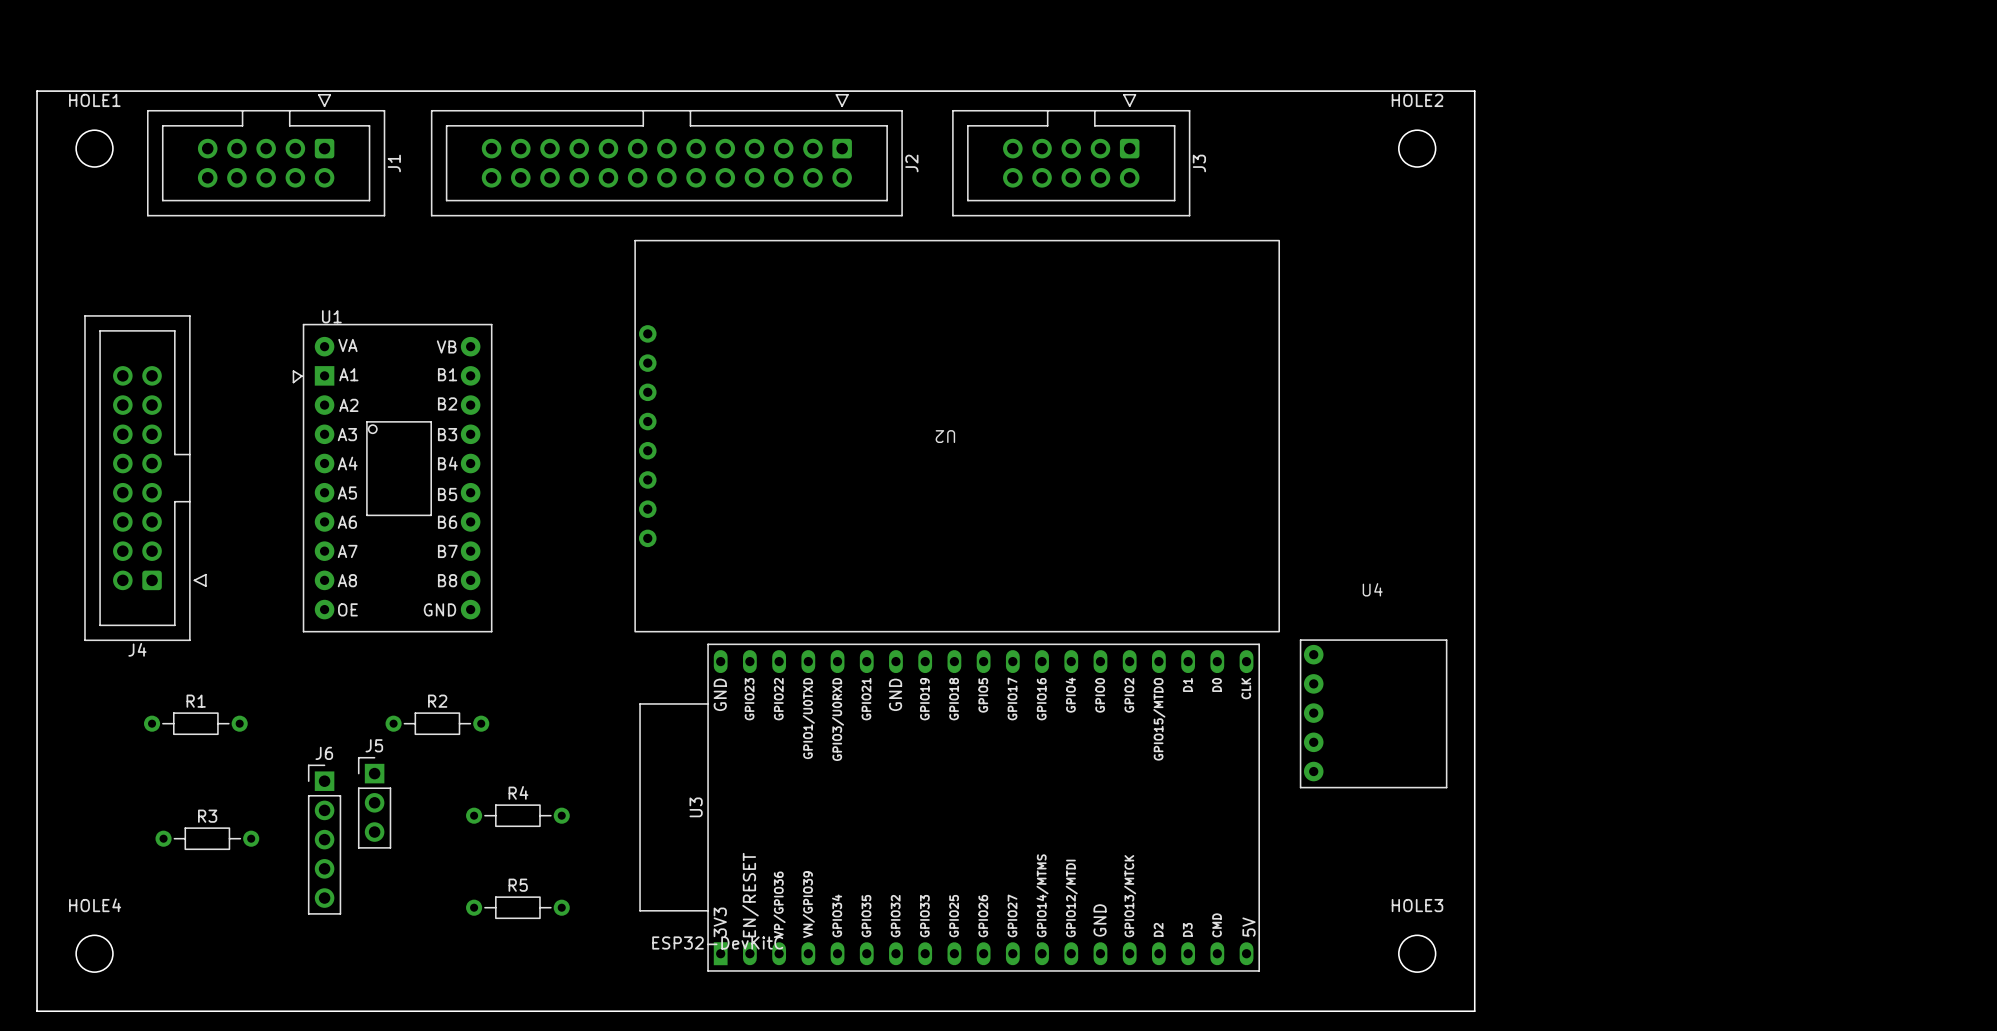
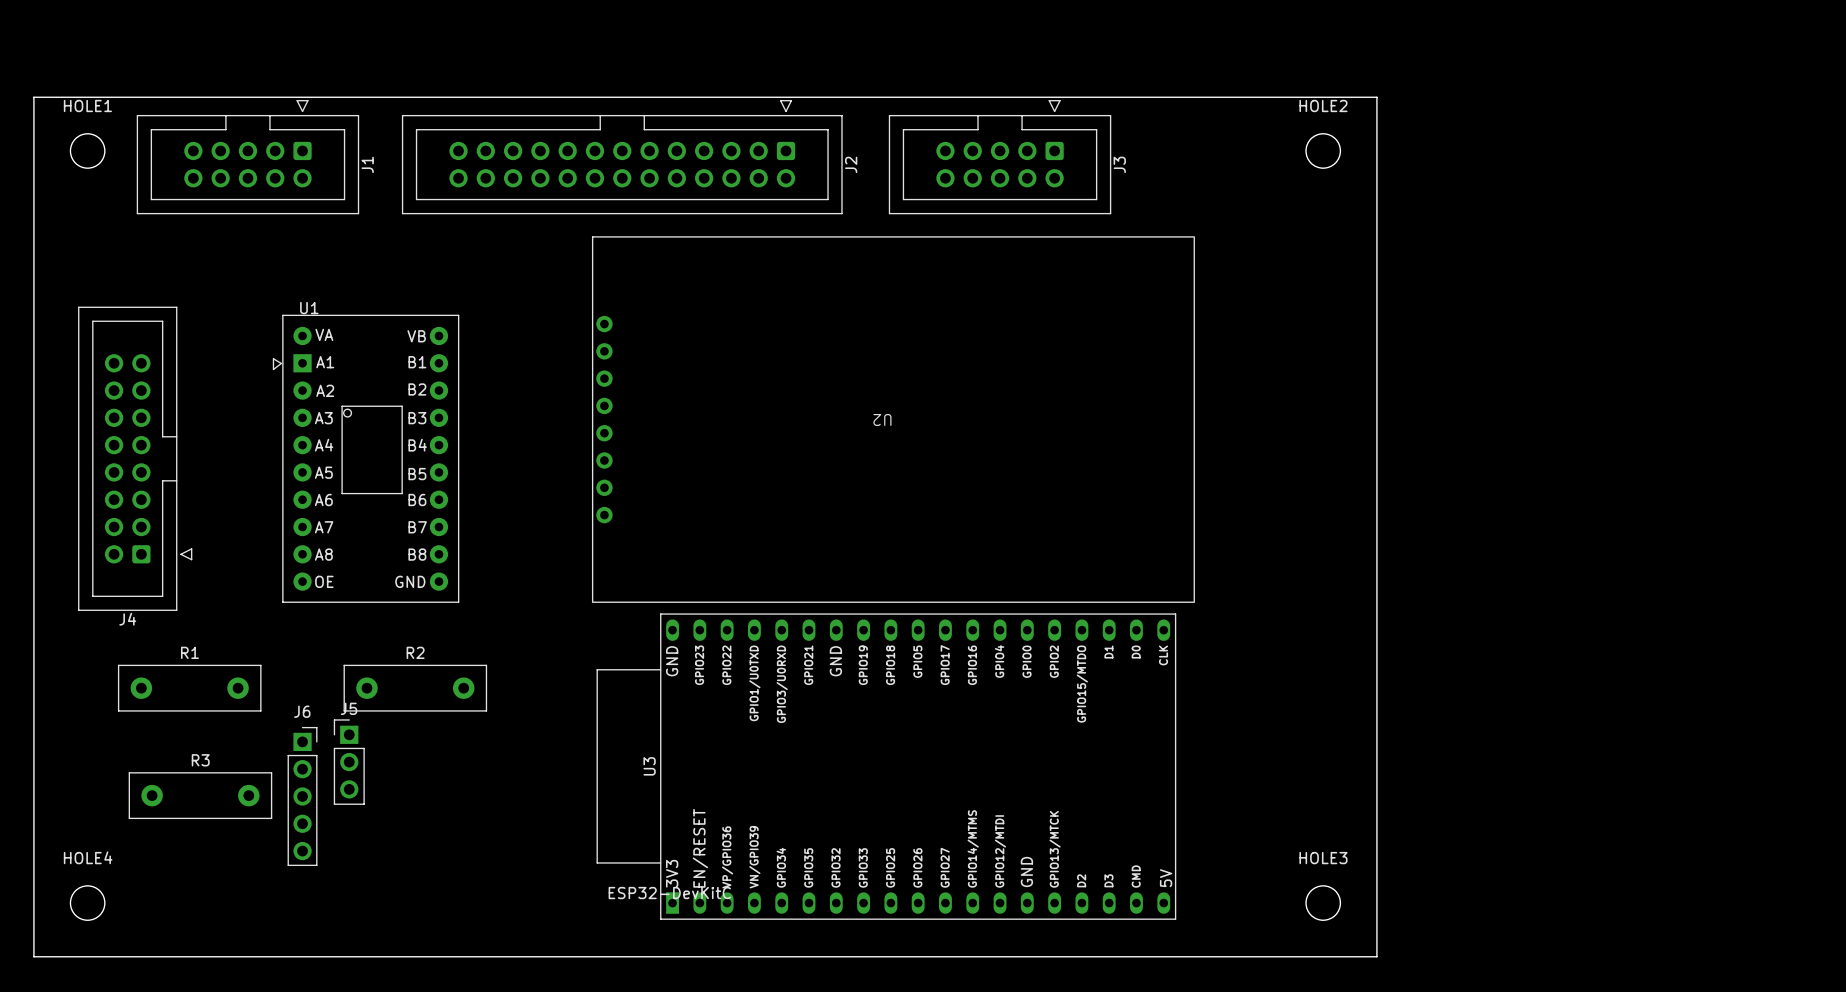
R1 footprint: [143, 712, 248, 735] -> [117, 664, 262, 712]
R2 footprint: [385, 712, 490, 735] -> [343, 664, 488, 712]
U4: (1373, 713) -> none
J6 footprint: [308, 764, 342, 915] -> [287, 726, 318, 866]
R4: (517, 815) -> none
R3 footprint: [155, 827, 260, 850] -> [128, 772, 273, 820]
R5: (517, 907) -> none

